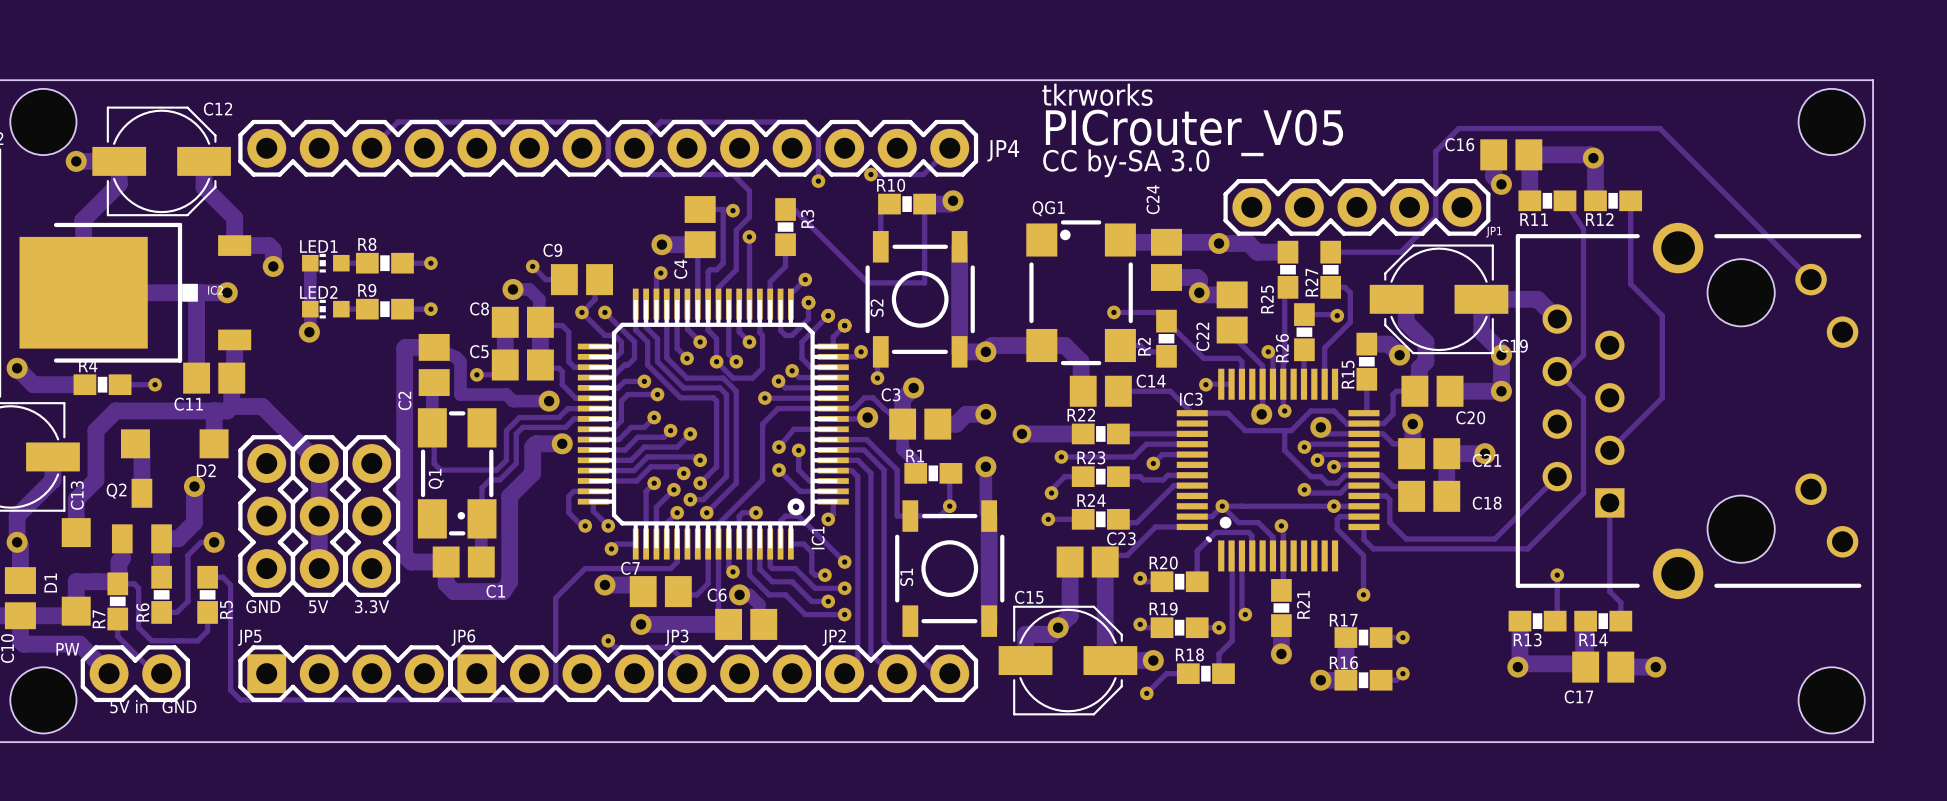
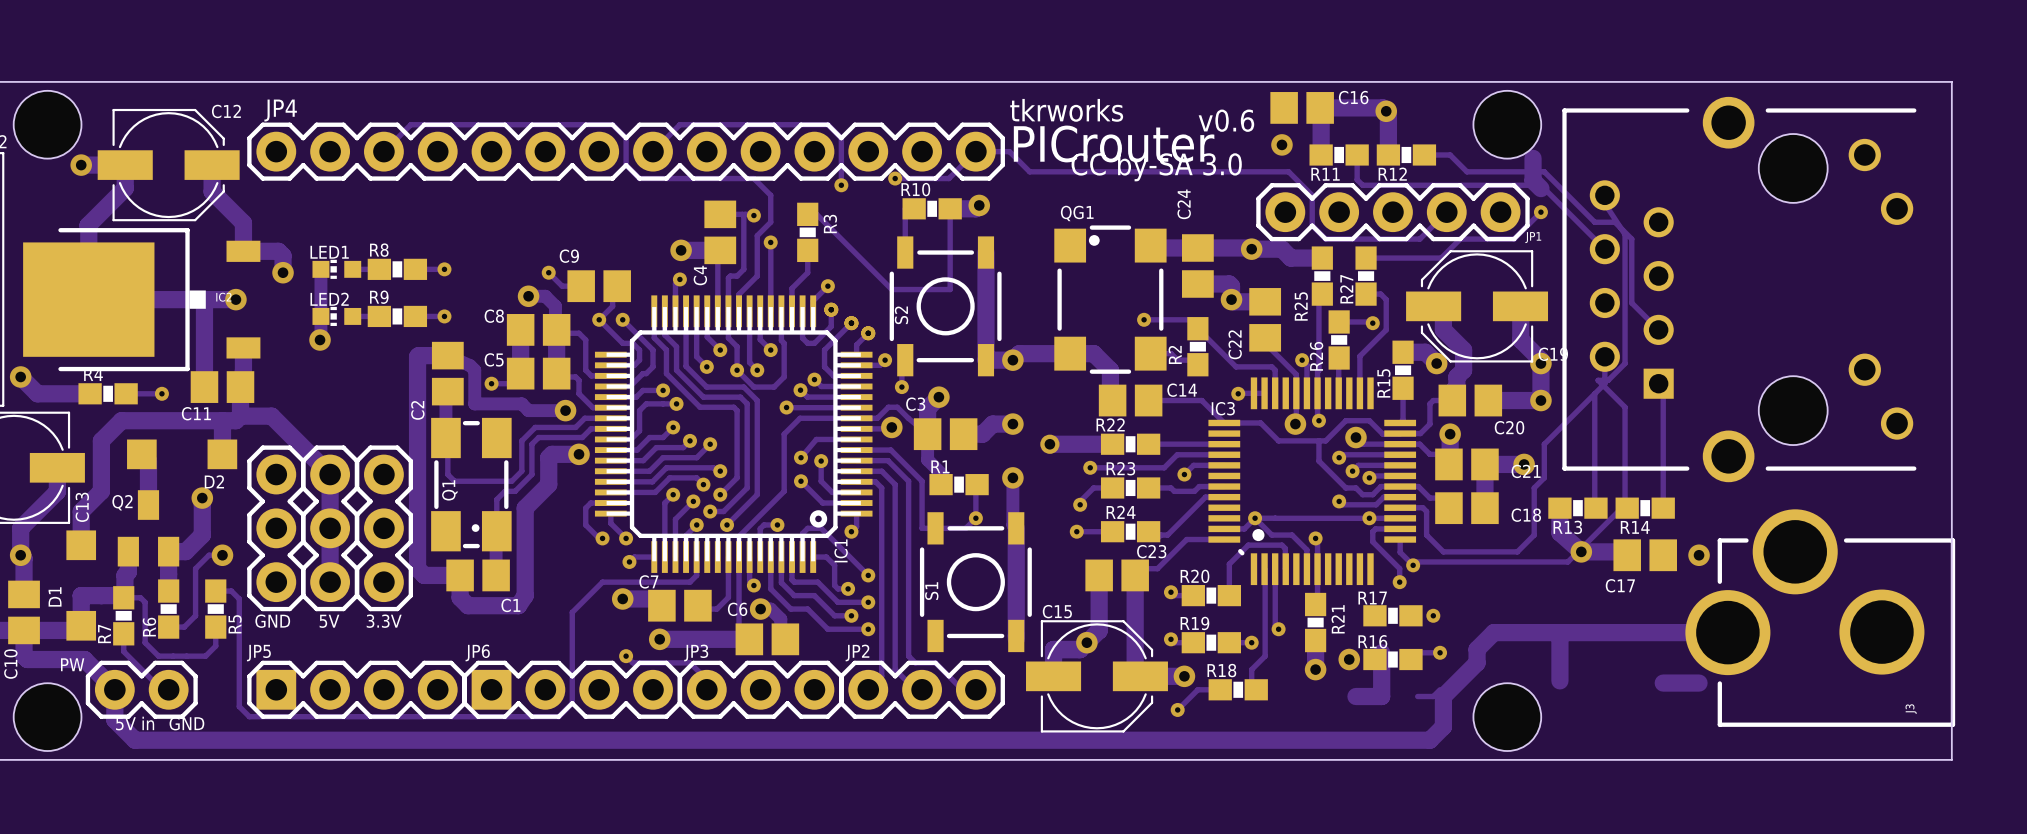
board edge: (1873, 80) (1873, 742) -> (1921, 81) (1951, 81) (1951, 759) (1921, 759)
text position: tkrworks (1097, 94) -> tkrworks (1066, 110)
via: none -> (1386, 111)
text: none -> v0.6 (1226, 120)
hole: none -> (1507, 124)
hole: (1831, 121) -> none
text: PICrouter_V05 (1194, 132) -> PICrouter (1114, 143)
via: none -> (1281, 144)
C16 name position: C16 (1459, 144) -> C16 (1353, 97)
track: none -> (975, 151) (1009, 151) (1029, 171) (1288, 171) (1312, 195) (1312, 225) (1325, 239) (1419, 239) (1446, 212)
JP4 name position: JP4 (1003, 150) -> JP4 (280, 110)
track: none -> (1357, 155) (1357, 179) (1362, 185) (1540, 185) (1604, 249)
track: none -> (1424, 155) (1450, 155) (1466, 171) (1544, 171) (1594, 222) (1614, 222) (1631, 239) (1631, 302) (1658, 329)
C16 position: (1511, 154) -> (1302, 107)
via: (1593, 158) -> none
via: (1501, 184) -> none
track: (1529, 200) (1528, 154) (1590, 154) (1595, 160) (1595, 200) -> (1321, 155) (1320, 107) (1382, 107) (1388, 113) (1388, 155)
R11 position: (1547, 200) -> (1339, 155)
R12 position: (1613, 200) -> (1406, 155)
track: (1630, 200) (1630, 284) (1662, 315) (1662, 397) (1609, 450) -> none
via: none -> (1540, 212)
track: (1400, 252) (1435, 217) (1435, 151) (1458, 128) (1659, 128) (1811, 279) -> (1437, 258) (1441, 258) (1460, 239) (1514, 239) (1540, 212)
track: (1481, 299) (1537, 299) (1557, 319) -> none
track: none -> (1658, 383) (1663, 388) (1663, 508)
track: none -> (1594, 393) (1594, 508) (1598, 512)
part position: (1688, 410) -> (1739, 289)
track: (1557, 476) (1494, 539) (1478, 539) -> (1604, 356) (1604, 383) (1544, 444) (1544, 477) (1534, 487) (1534, 535) (1517, 551)
track: none -> (1559, 508) (1559, 532) (1581, 551) (1628, 551)
track: (1609, 502) (1609, 591) (1620, 602) (1620, 621) -> none
via: none -> (1581, 551)
via: none -> (1699, 555)
via: none -> (1413, 565)
track: (1363, 568) (1363, 594) -> none
via: none -> (1399, 582)
track: (1557, 575) (1557, 614) (1555, 621) (1557, 619) -> none
via: (1557, 575) -> none
via: (1363, 594) -> none
via: none -> (1433, 615)
J3: none -> (1820, 618)
track: none -> (1727, 632) (1493, 632) (1477, 649) (1477, 662) (1443, 696) (1443, 726) (1429, 740) (135, 740) (114, 720) (114, 689)
R13 position: (1537, 621) -> (1577, 508)
R14 position: (1603, 621) -> (1645, 508)
R17 position: (1363, 637) -> (1392, 615)
track: (1517, 667) (1521, 663) (1586, 663) (1583, 660) (1583, 623) (1585, 621) (1585, 667) -> none
via: (1517, 667) -> none
C17 position: (1603, 667) -> (1645, 555)
via: (1655, 667) -> none
via: (1402, 673) -> none
via position: (1320, 680) -> (1349, 659)
R16 position: (1363, 680) -> (1392, 659)
hole: none -> (1507, 717)
hole: (1831, 700) -> none

